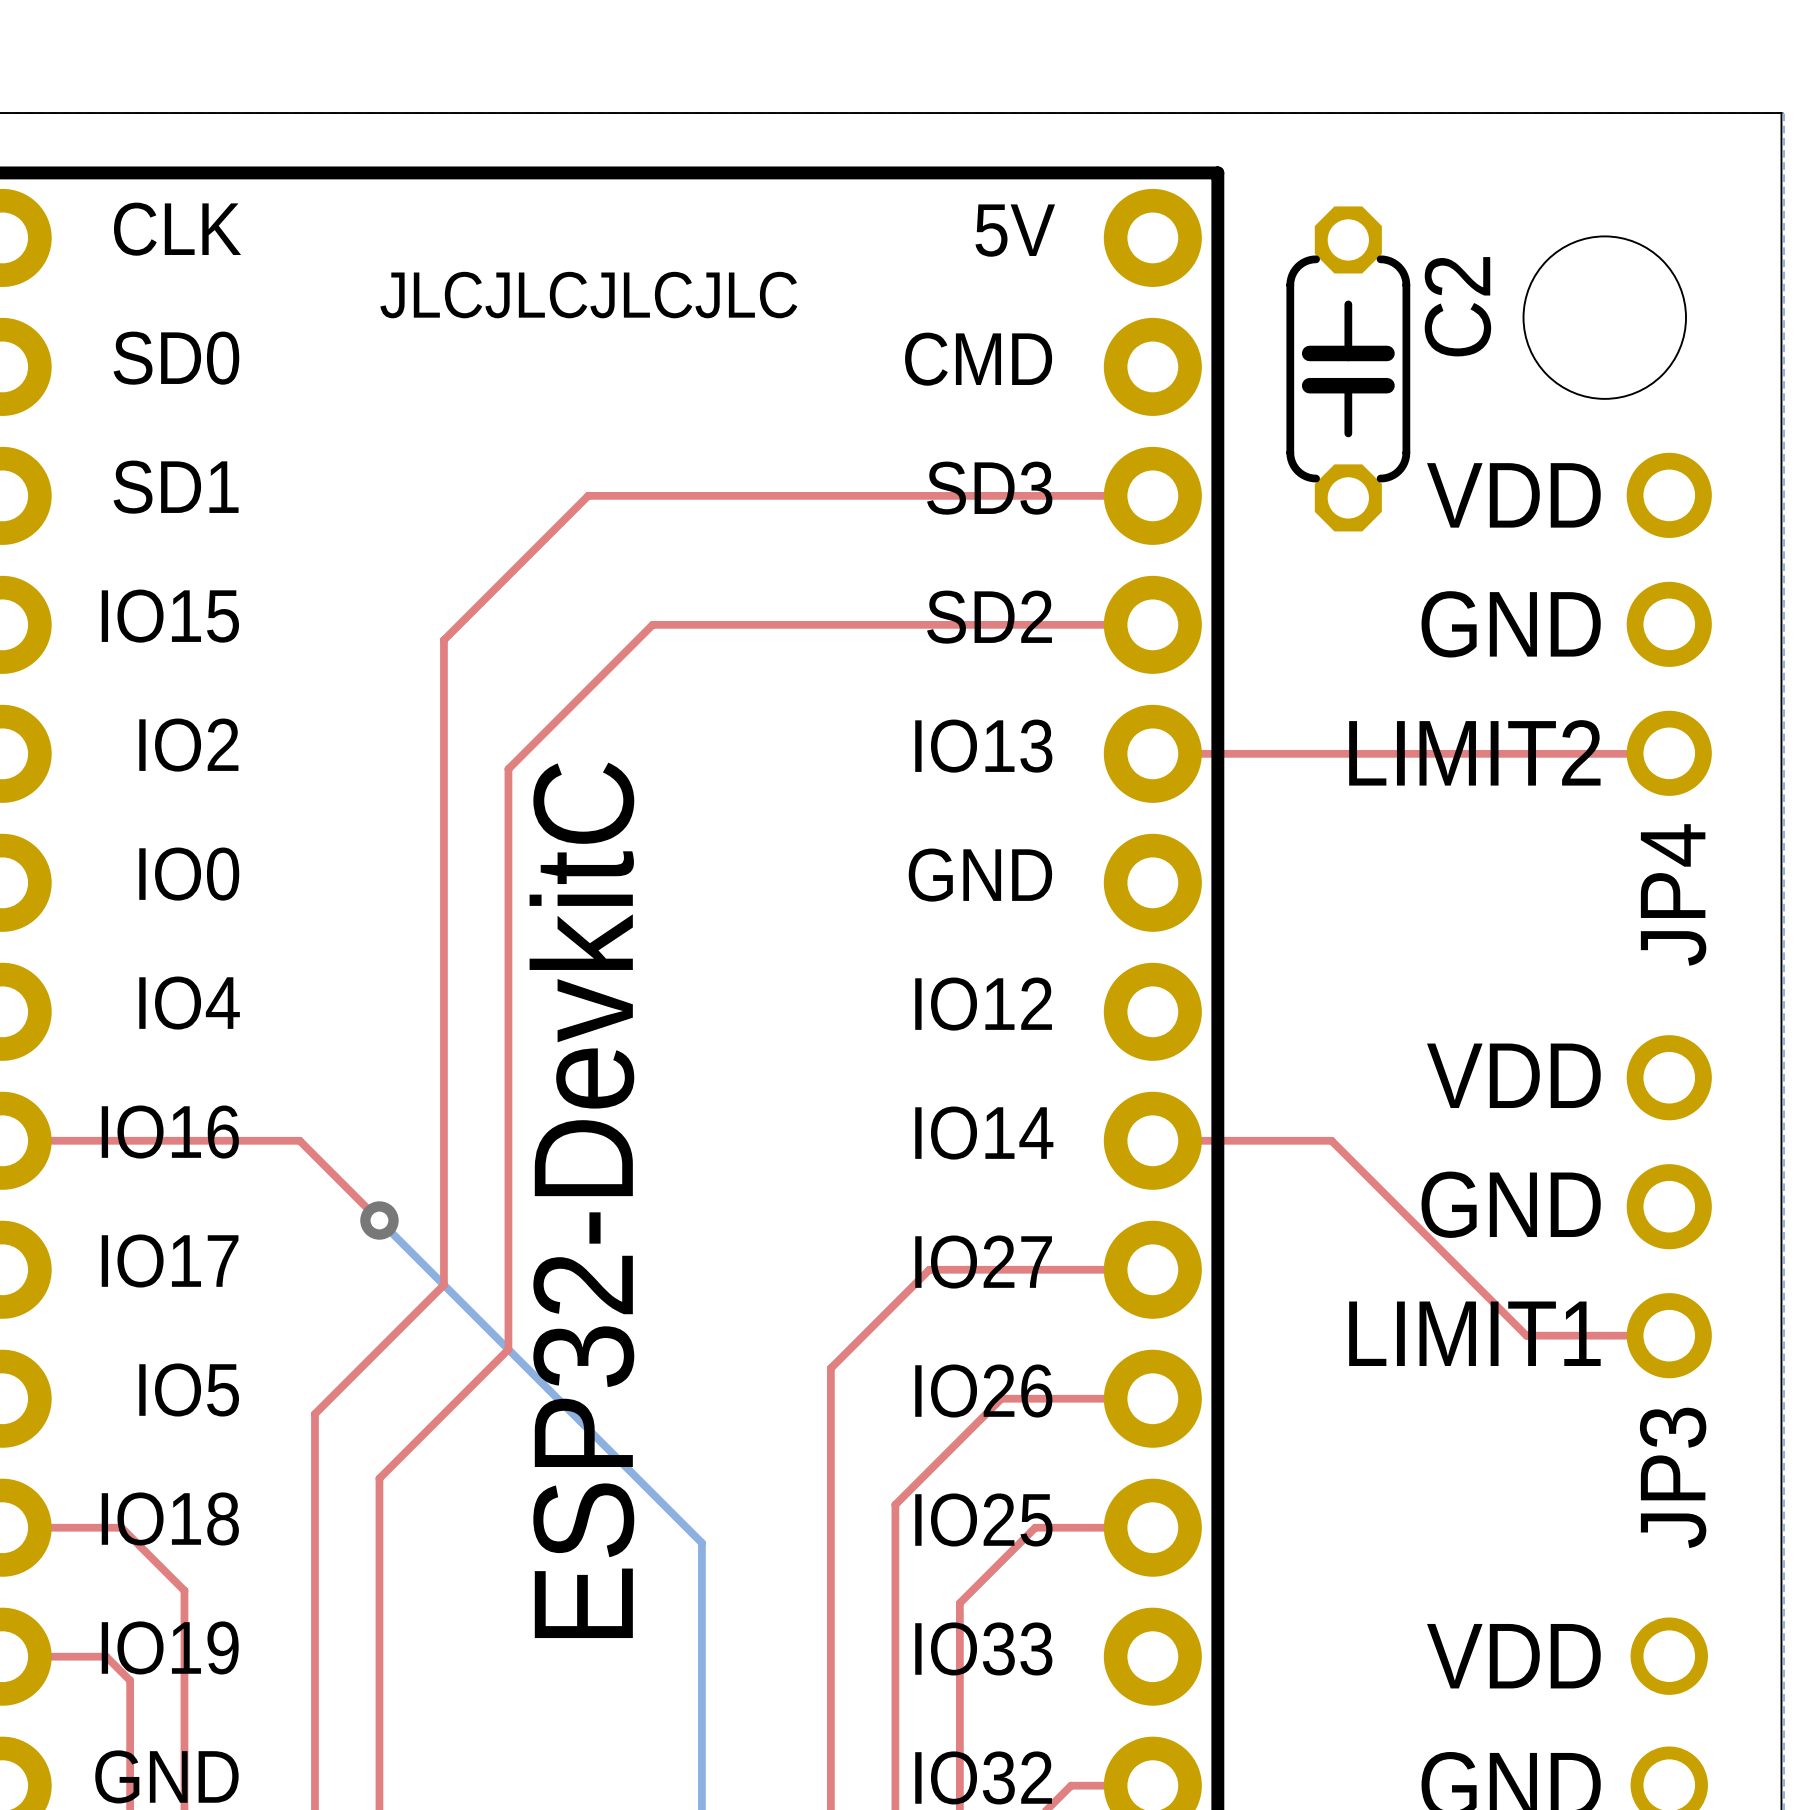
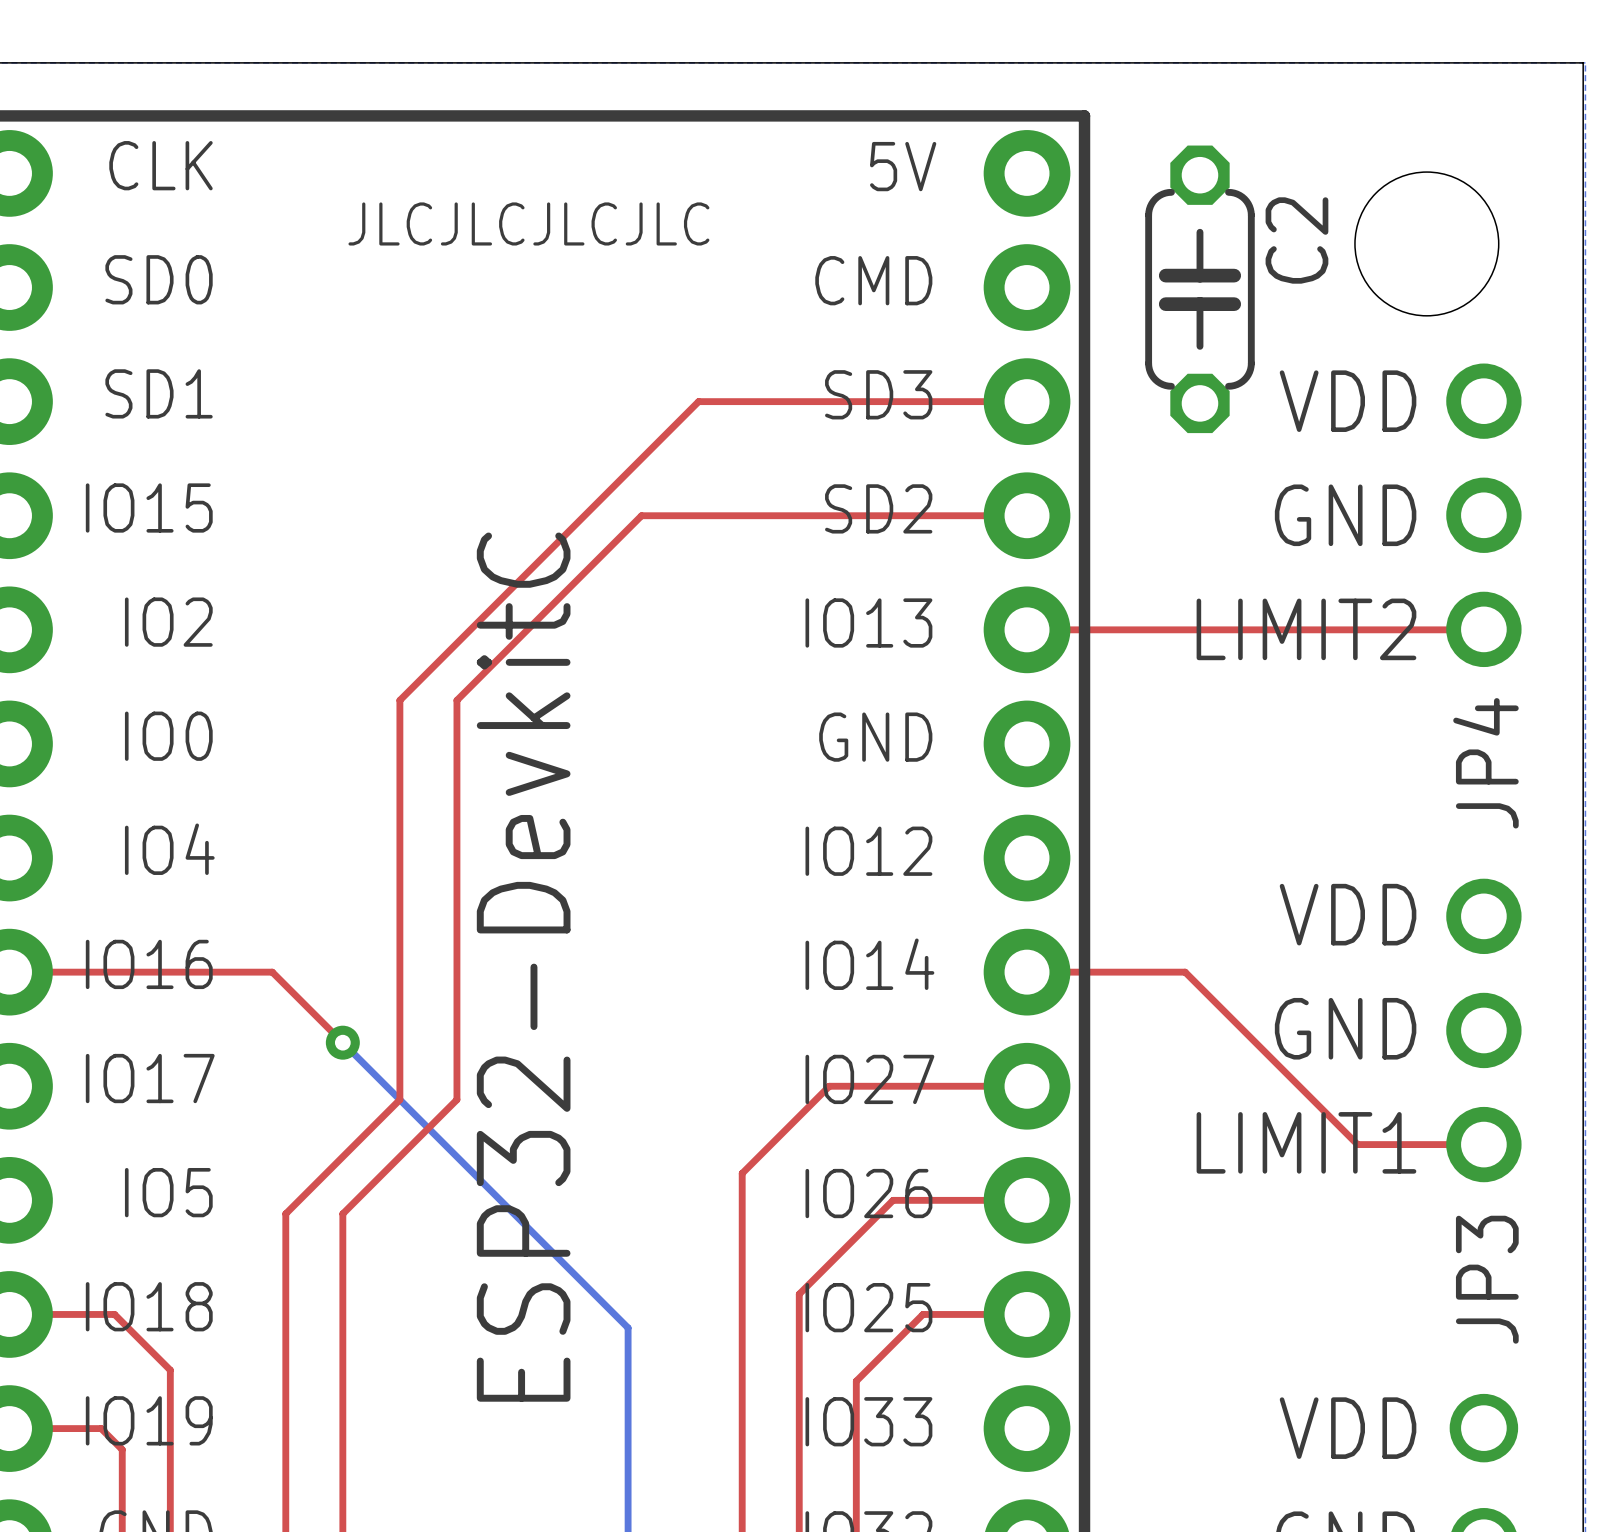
top track: (781, 495) (588, 495) (443, 640) (443, 833) -> none
top track: (652, 624) (717, 624) -> (584, 515) (698, 401)
top track: none -> (641, 515) (456, 700)
top track: (508, 769) (508, 833) -> (456, 643) (399, 700)
top track: (508, 1285) (508, 1349) (379, 1478) -> (456, 1099) (342, 1213) (342, 1270)

